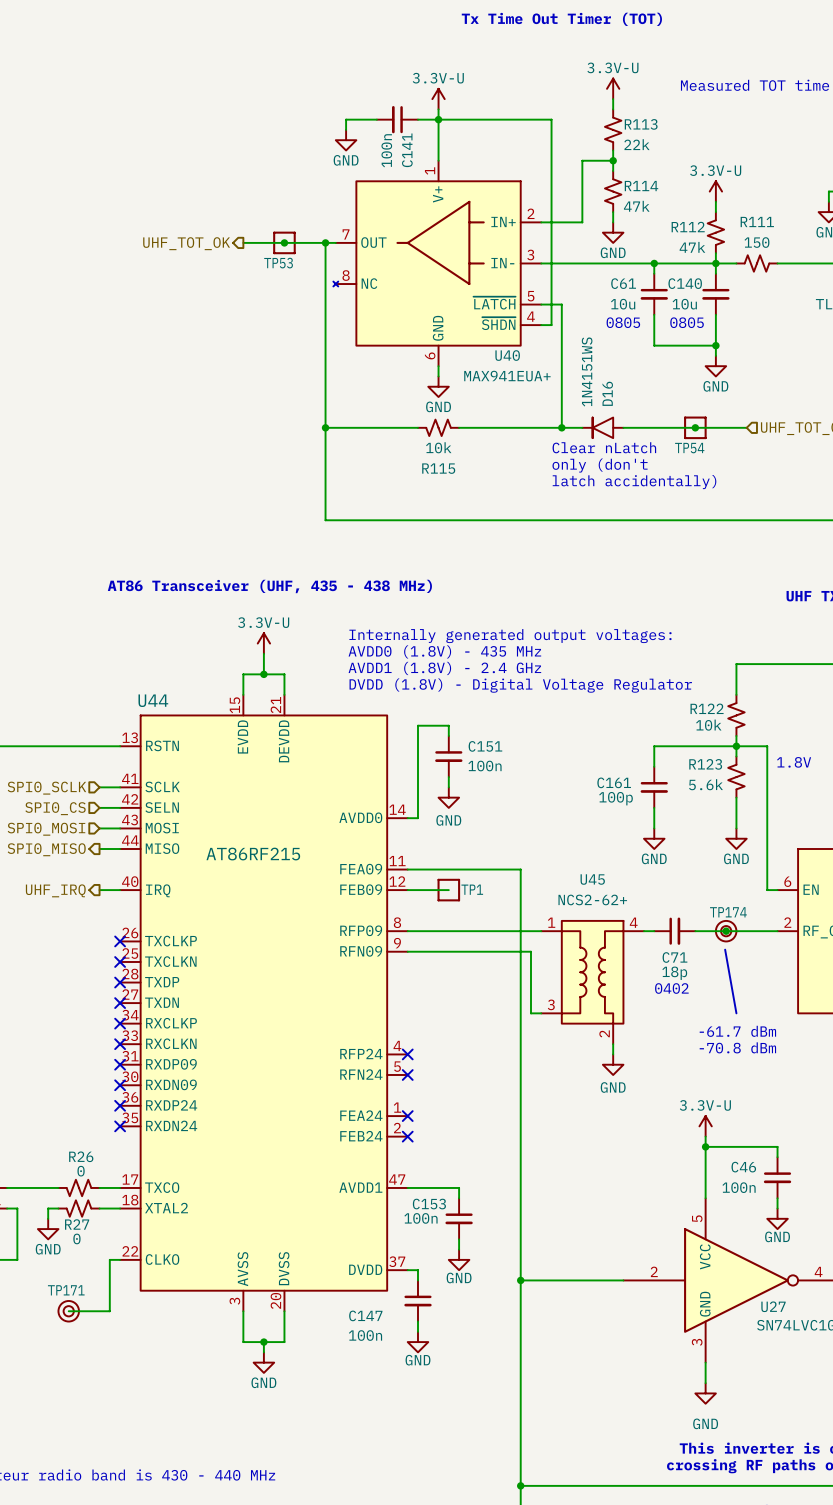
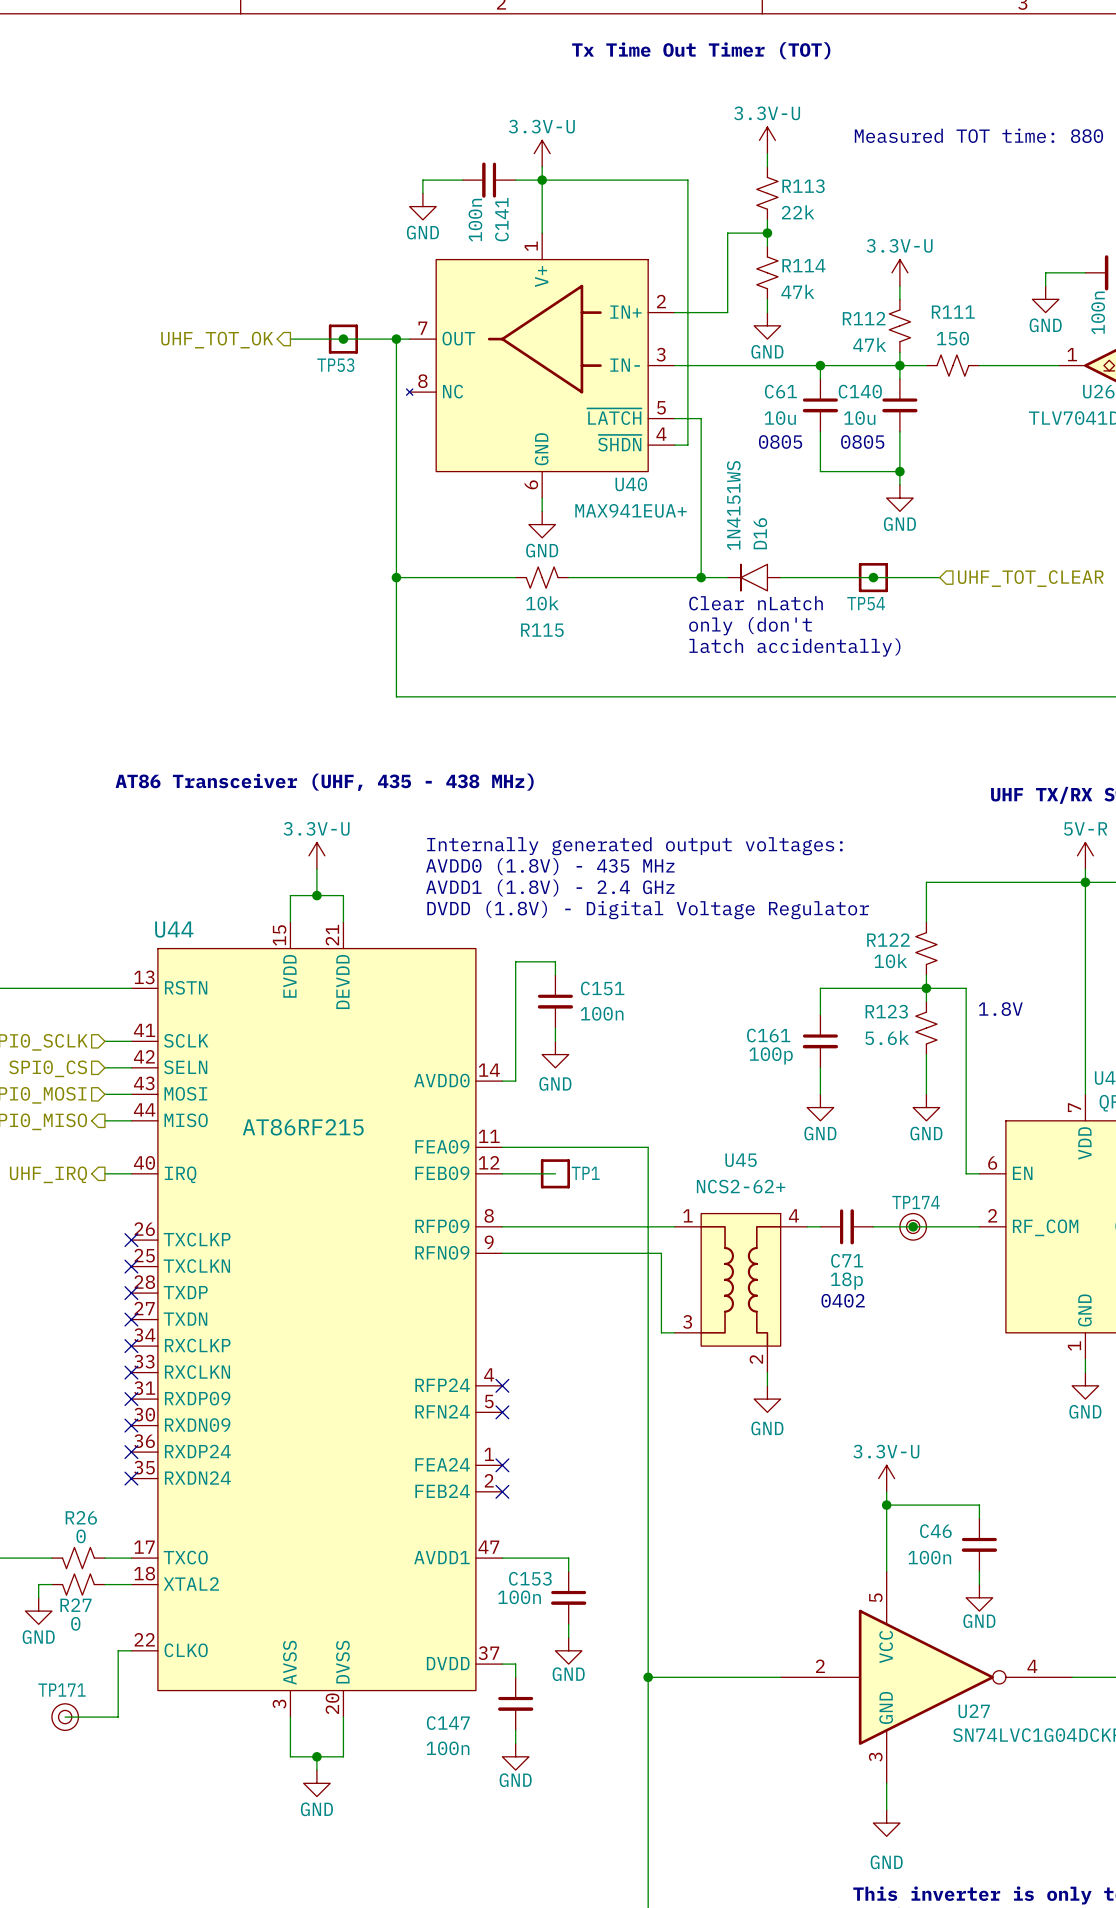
line: (725, 949) (736, 1013) -> none
text: -61.7 dBm (737, 1031) -> none
text: -70.8 dBm (737, 1047) -> none

